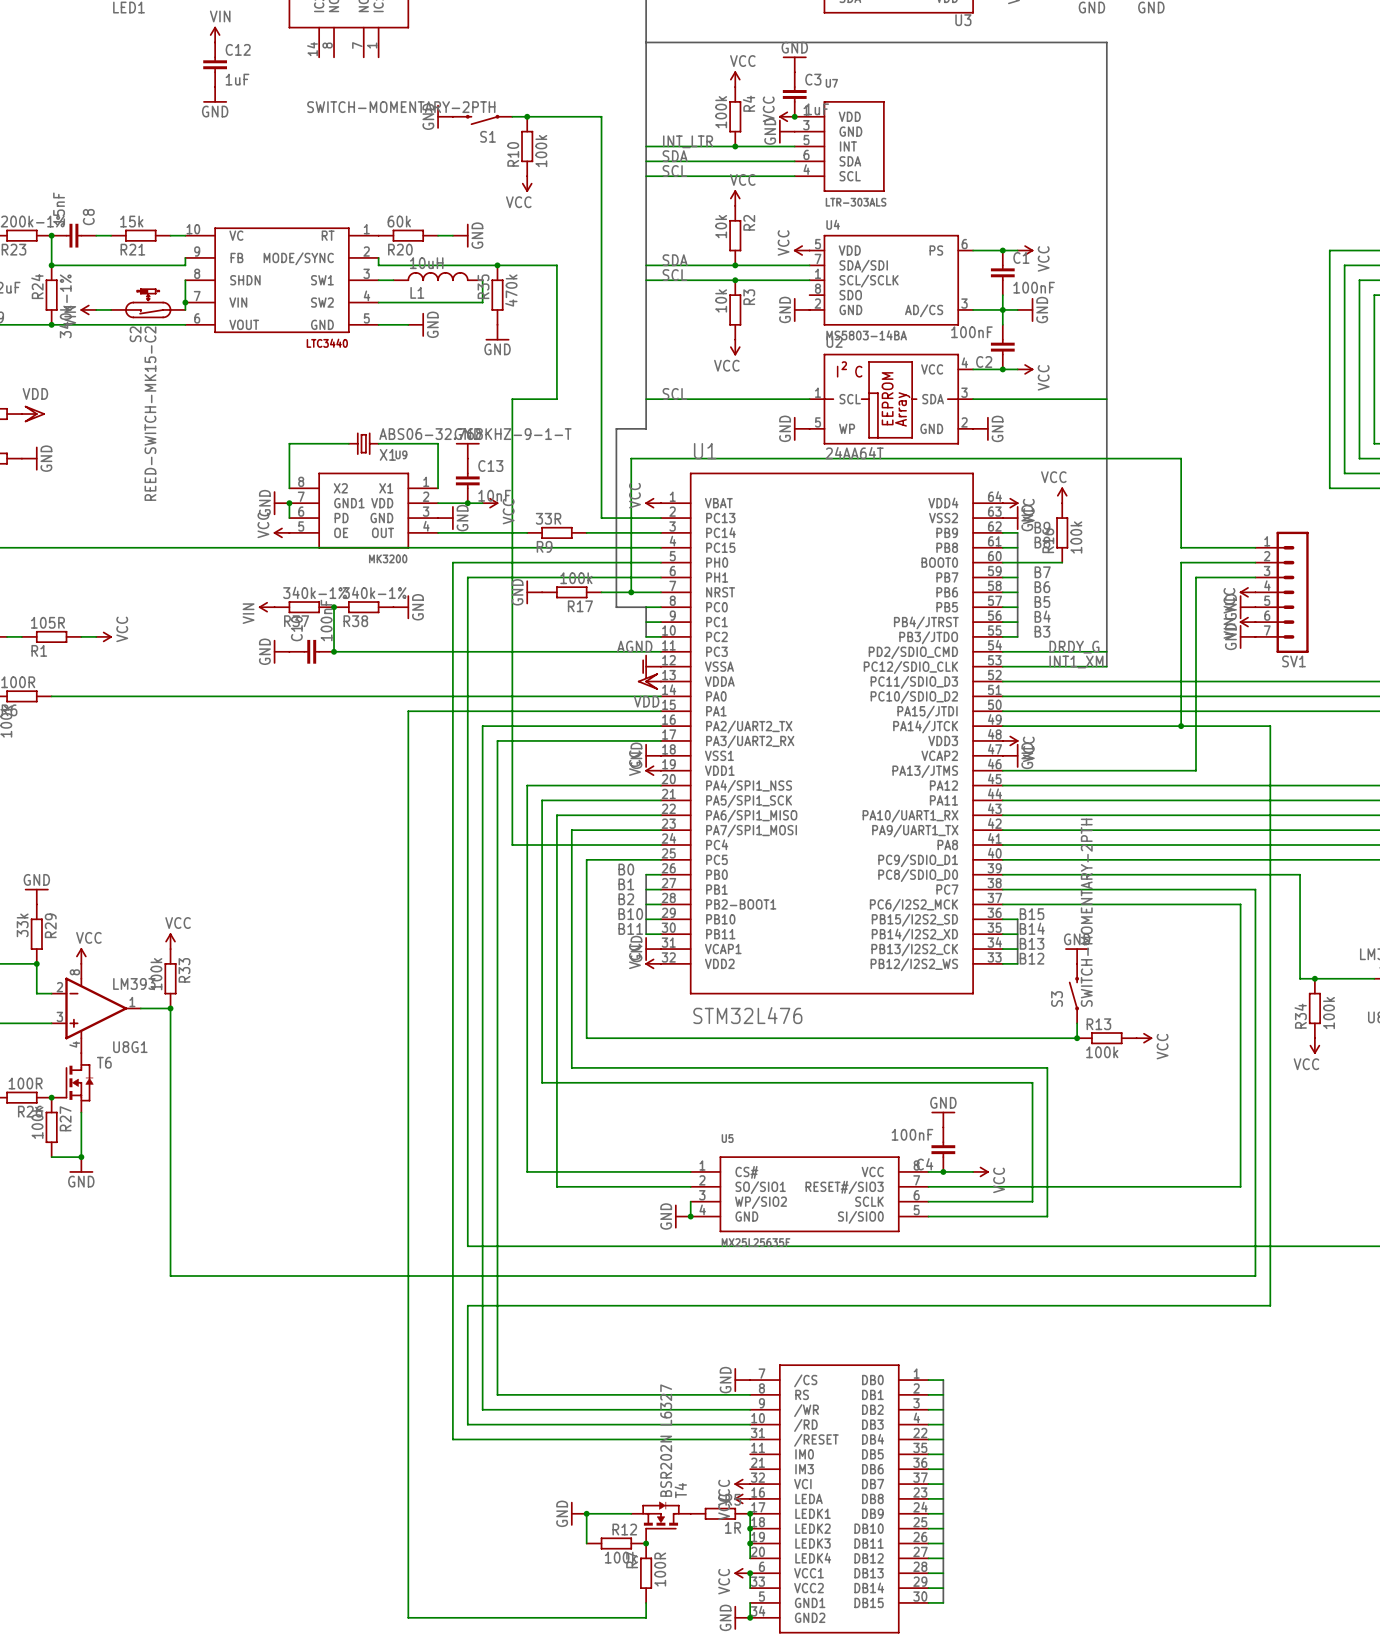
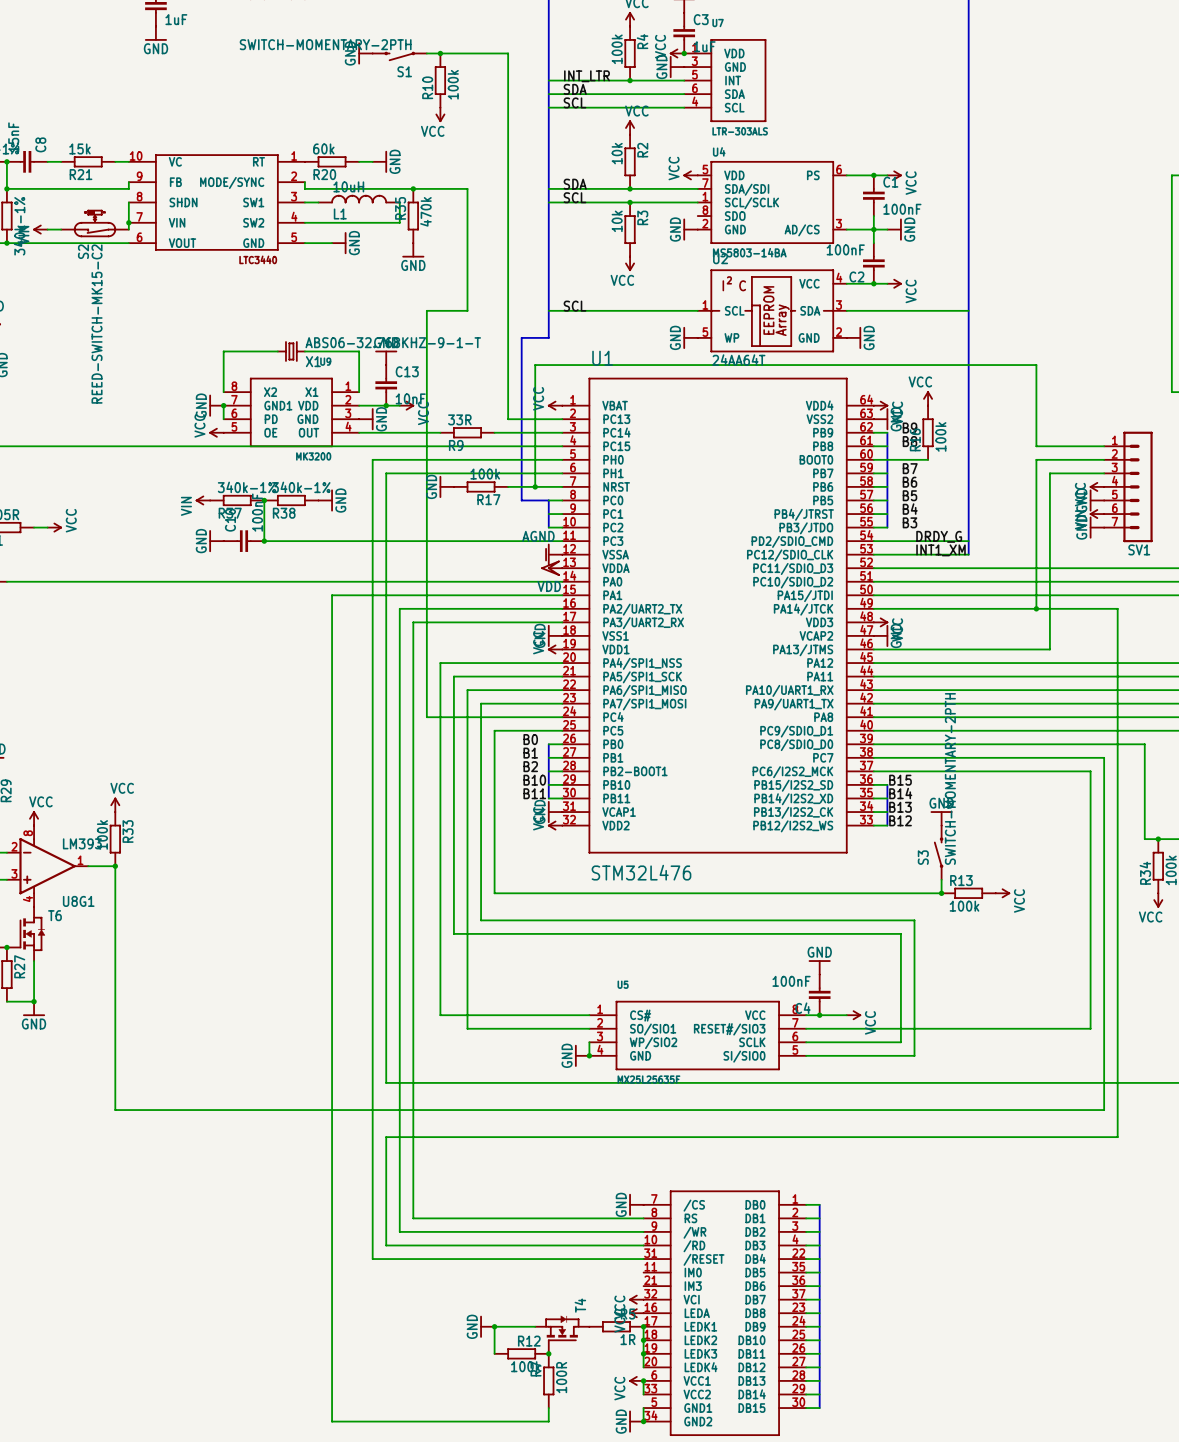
T4 value: BSR202N L6327 (666, 1440) -> none

